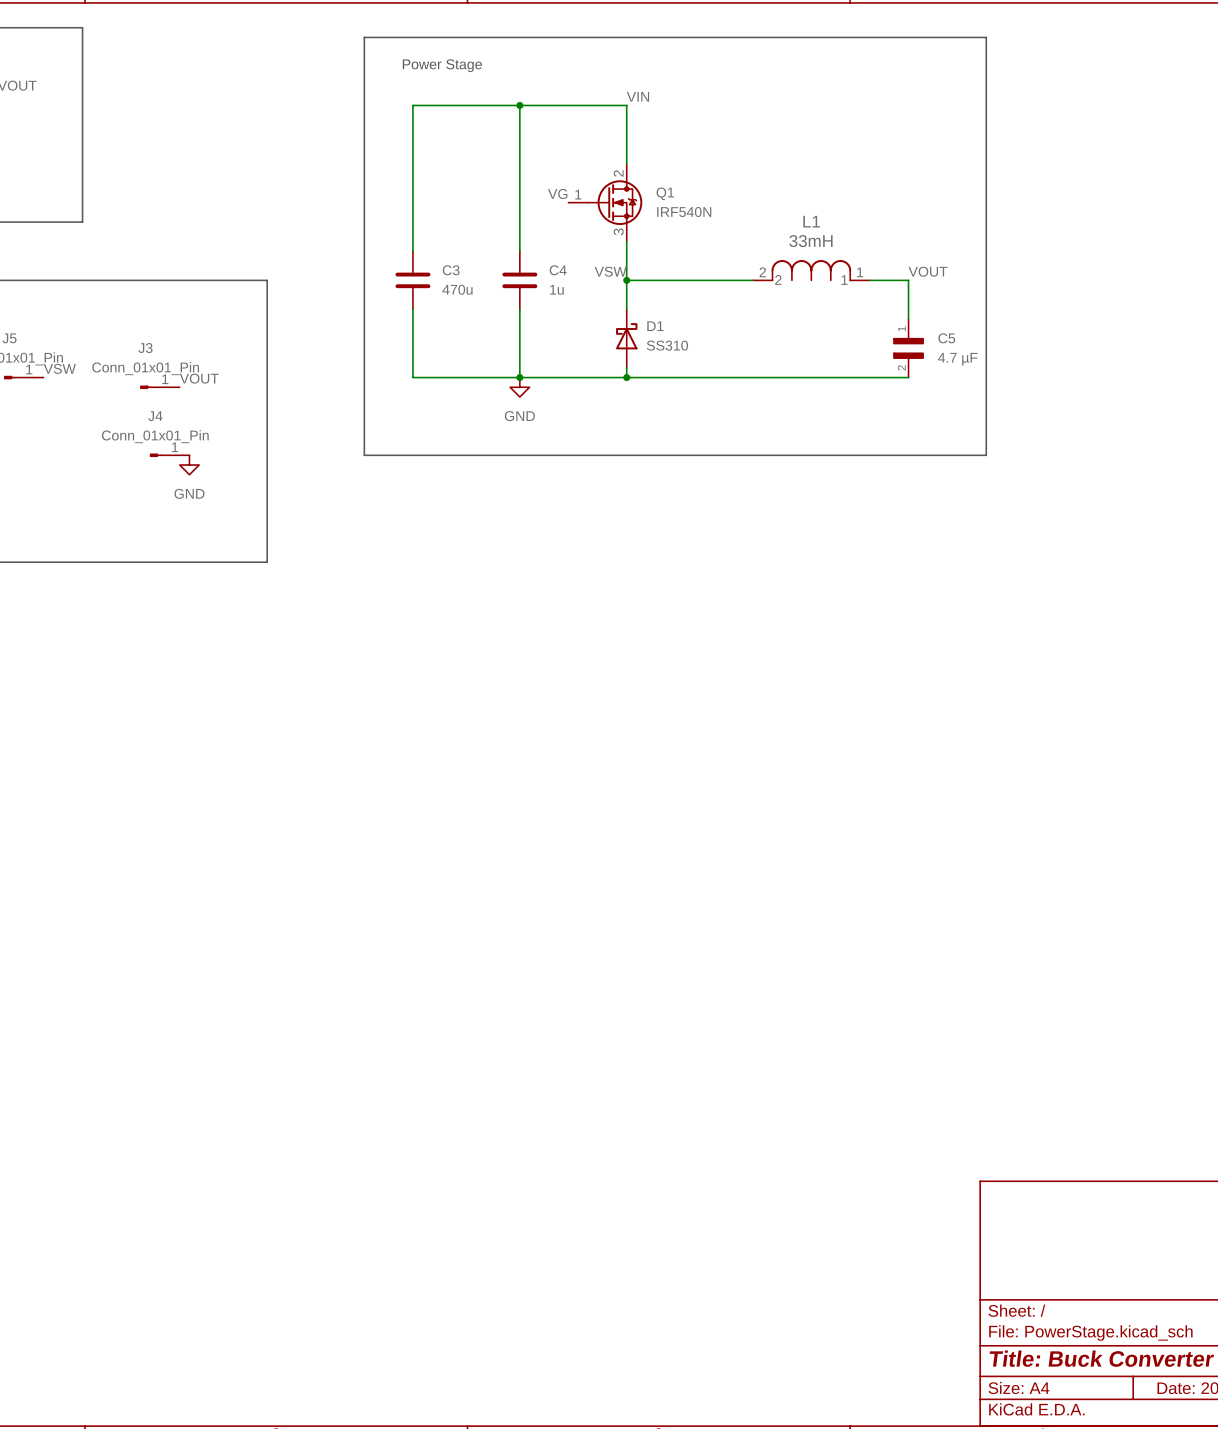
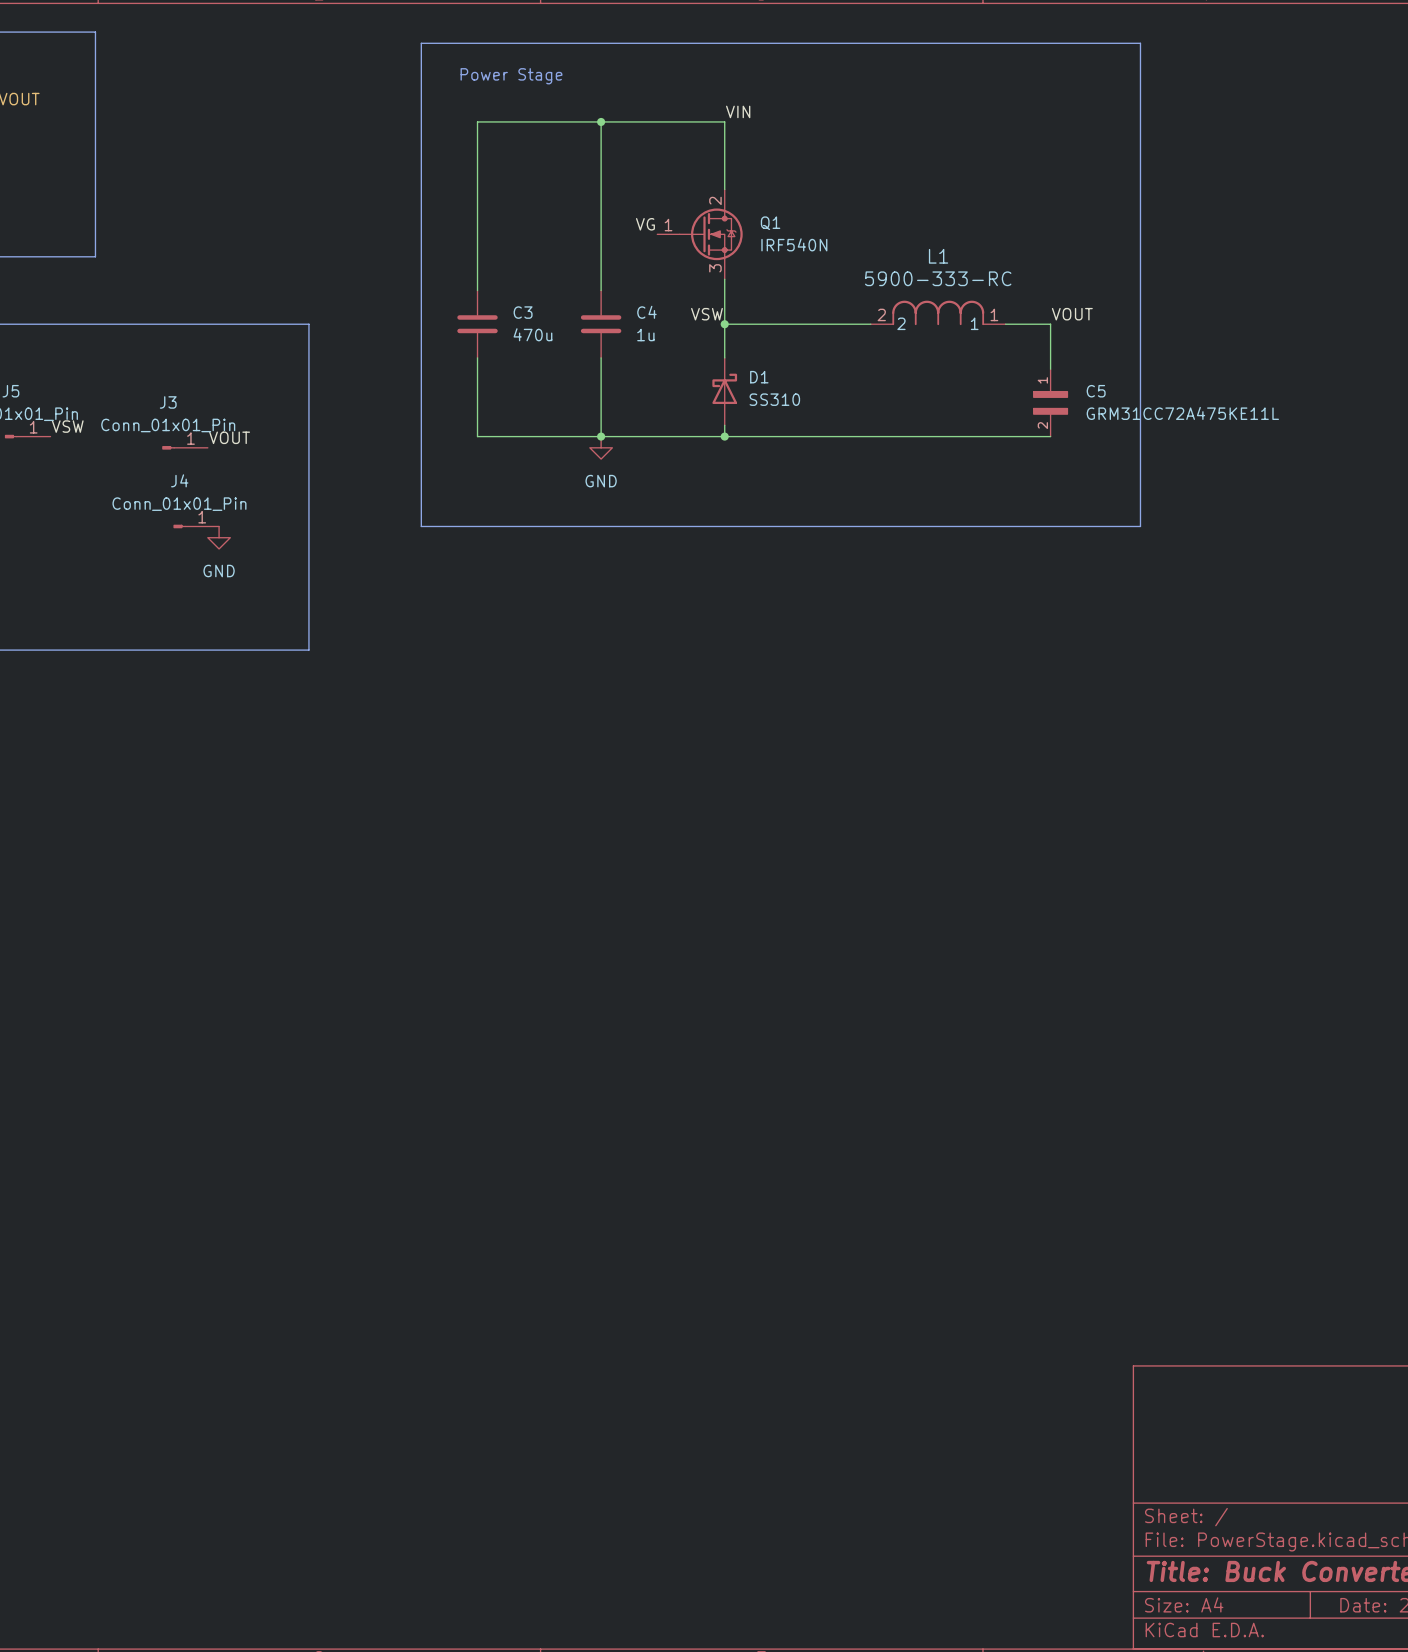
L1 value: 33mH (810, 241) -> 5900-333-RC (938, 278)
C5 value: 4.7 µF (957, 359) -> GRM31CC72A475KE11L (1182, 413)

